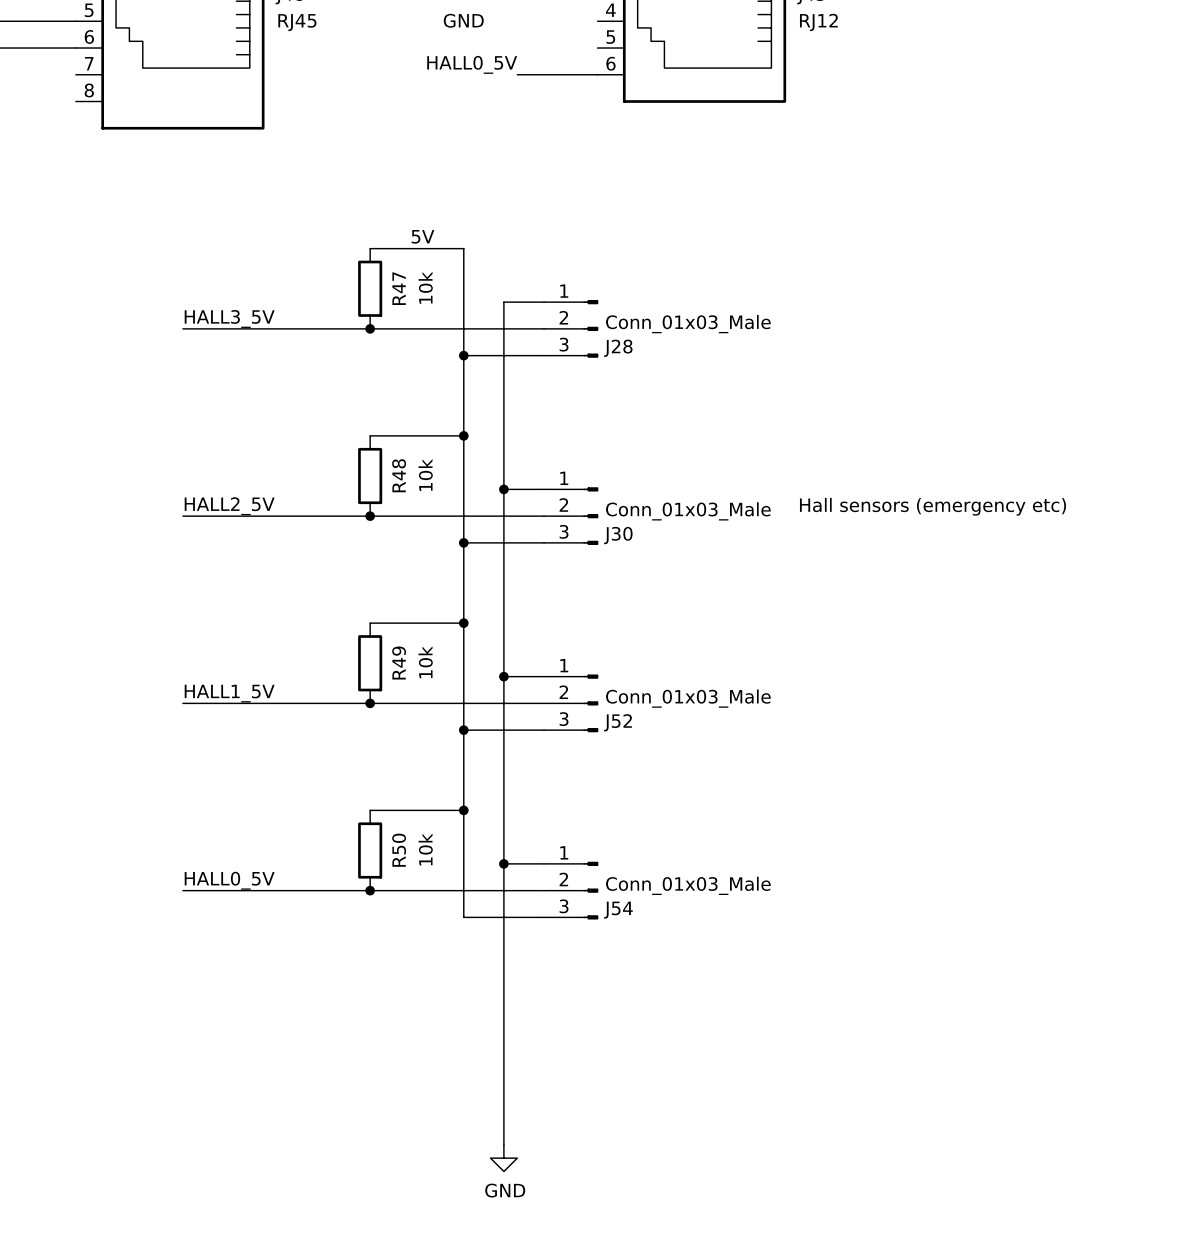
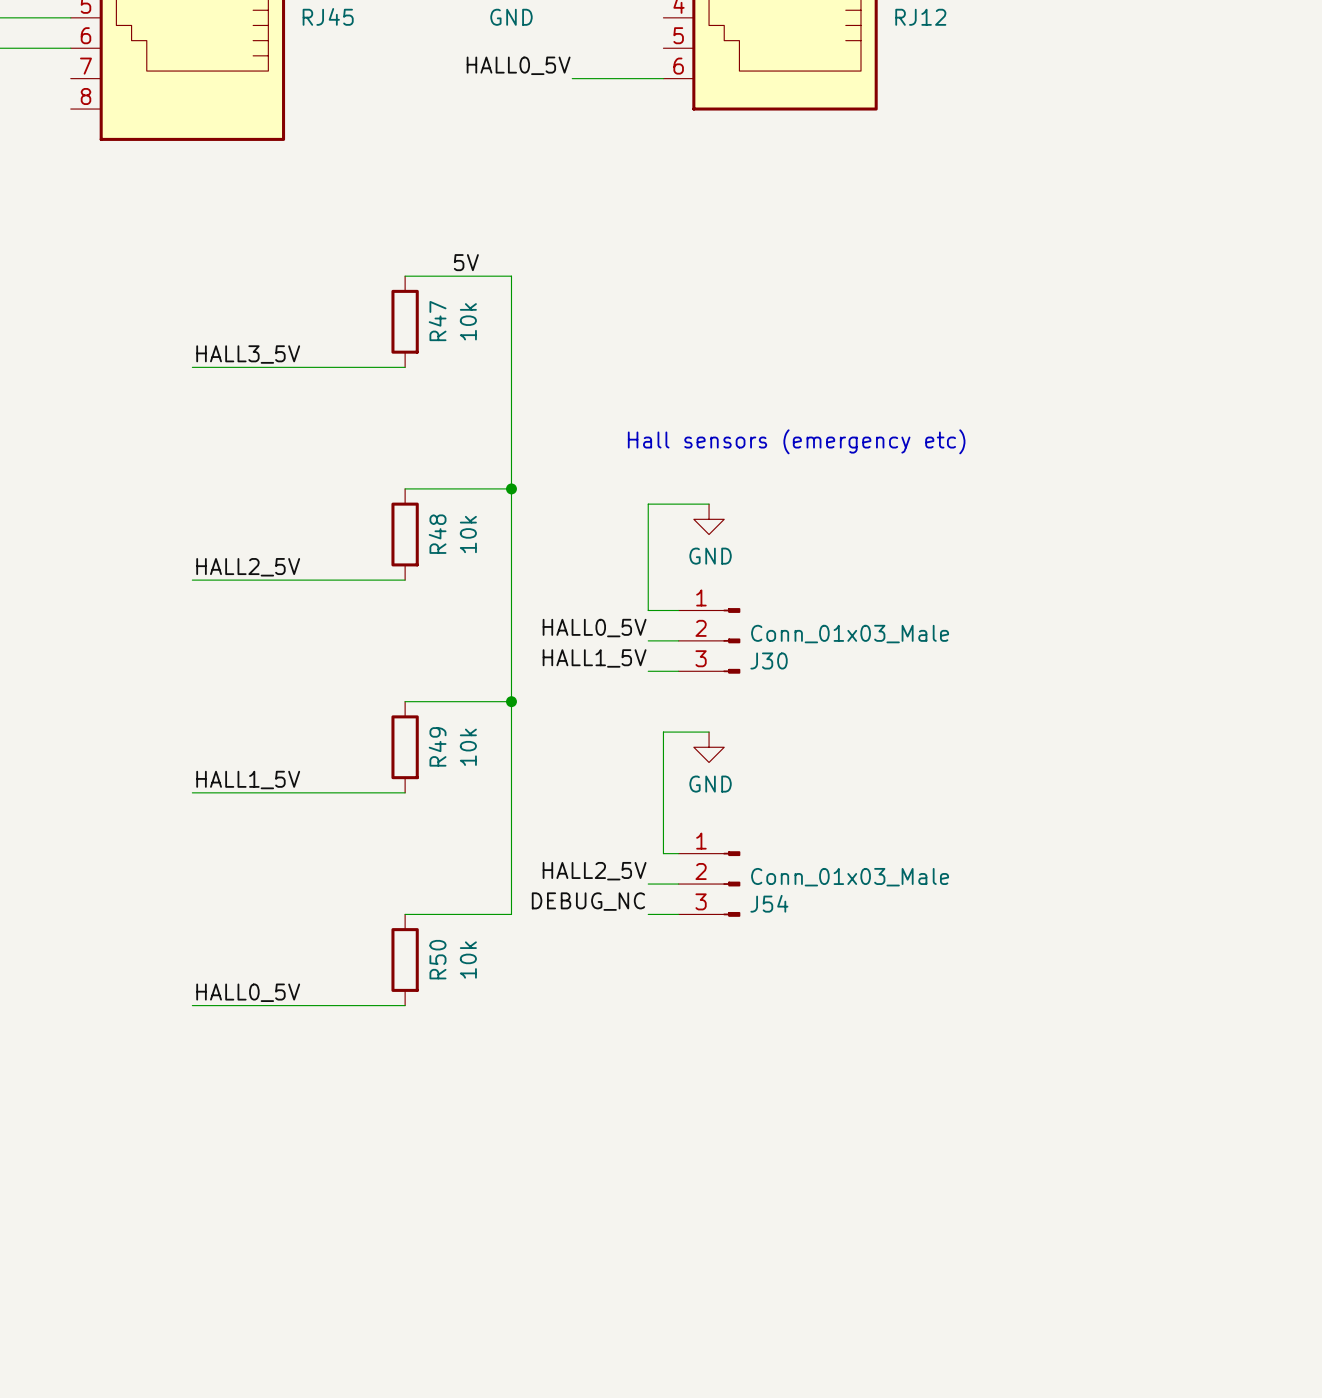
wire: (544, 302) (503, 302) (503, 1144) -> none
wire: (370, 328) (544, 328) -> none
junction: (370, 328) -> none
J28: Conn_01x03_Male (571, 328) -> none
wire: (463, 355) (544, 355) -> none
junction: (463, 355) -> none
wire: none -> (709, 504) (648, 504) (648, 610) (678, 610)
power symbol: none -> GND (709, 519)
wire: (503, 489) (544, 489) -> none
junction: (503, 489) -> none
text position: Hall sensors (emergency etc) (933, 506) -> Hall sensors (emergency etc) (796, 441)
wire: (370, 516) (544, 516) -> none
junction: (370, 516) -> none
J30 position: (571, 516) -> (709, 640)
wire: (463, 542) (544, 542) -> none
junction: (463, 542) -> none
label: none -> HALL0_5V (594, 628)
wire: none -> (648, 640) (678, 640)
label: none -> HALL1_5V (594, 658)
wire: none -> (648, 671) (678, 671)
wire: none -> (709, 732) (663, 732) (663, 853) (678, 853)
power symbol: none -> GND (709, 747)
wire: (503, 676) (544, 676) -> none
junction: (503, 676) -> none
wire: (370, 703) (544, 703) -> none
junction: (370, 703) -> none
J52: Conn_01x03_Male (571, 703) -> none
wire: (463, 730) (544, 730) -> none
junction: (463, 730) -> none
label: none -> HALL2_5V (594, 871)
wire: none -> (648, 884) (678, 884)
label: none -> DEBUG_NC (588, 901)
wire: (463, 810) (463, 917) (544, 917) -> none
junction: (463, 810) -> none
wire: none -> (648, 914) (678, 914)
wire: (503, 863) (544, 863) -> none
junction: (503, 863) -> none
wire: (370, 890) (544, 890) -> none
junction: (370, 890) -> none
J54 position: (571, 890) -> (709, 884)
power symbol: GND (503, 1158) -> none

